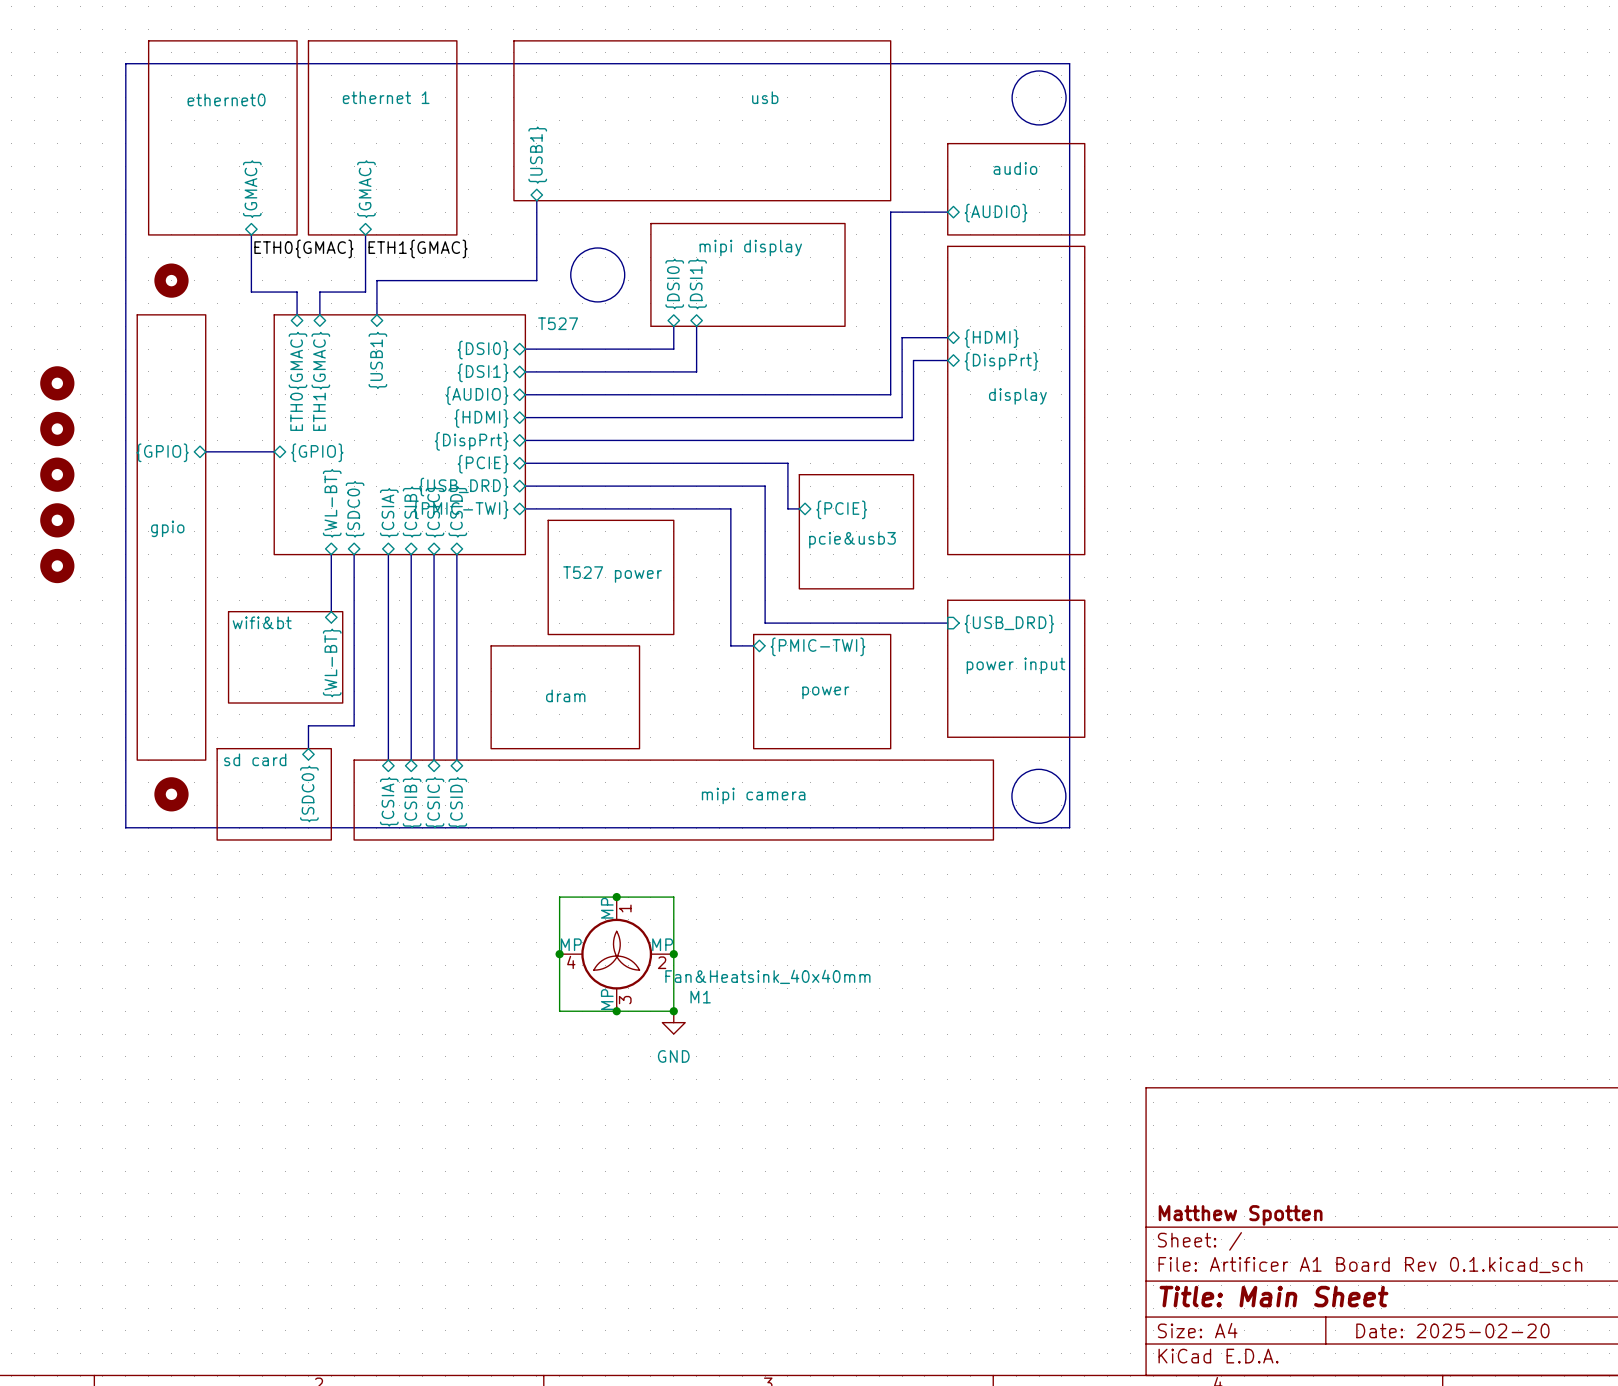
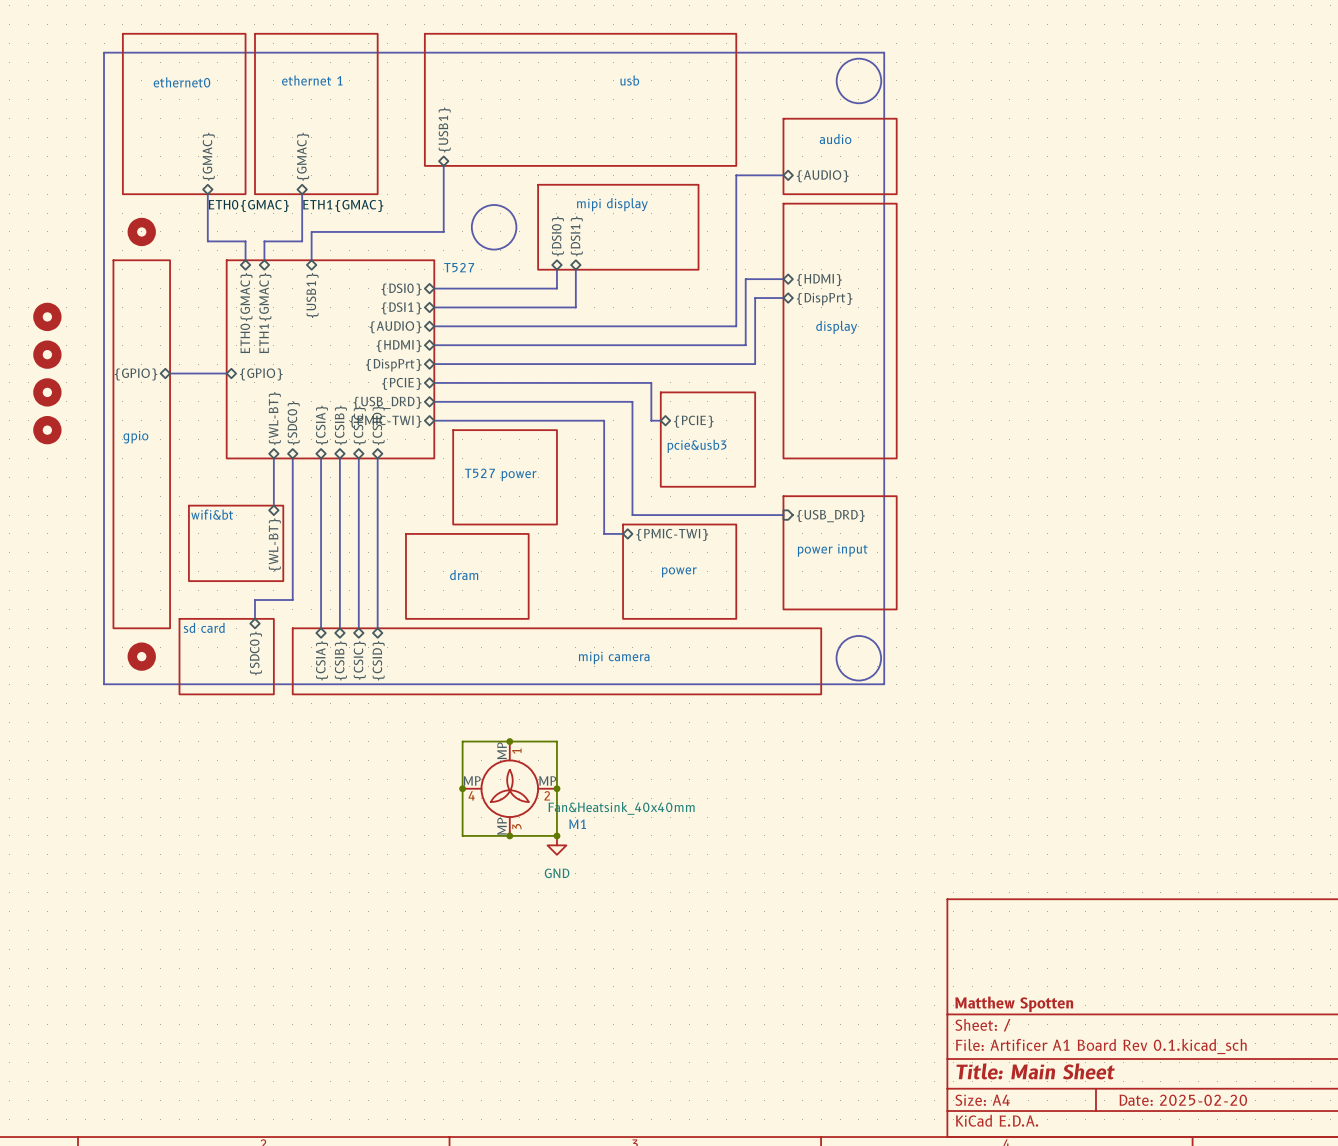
part: (57, 566) -> none

